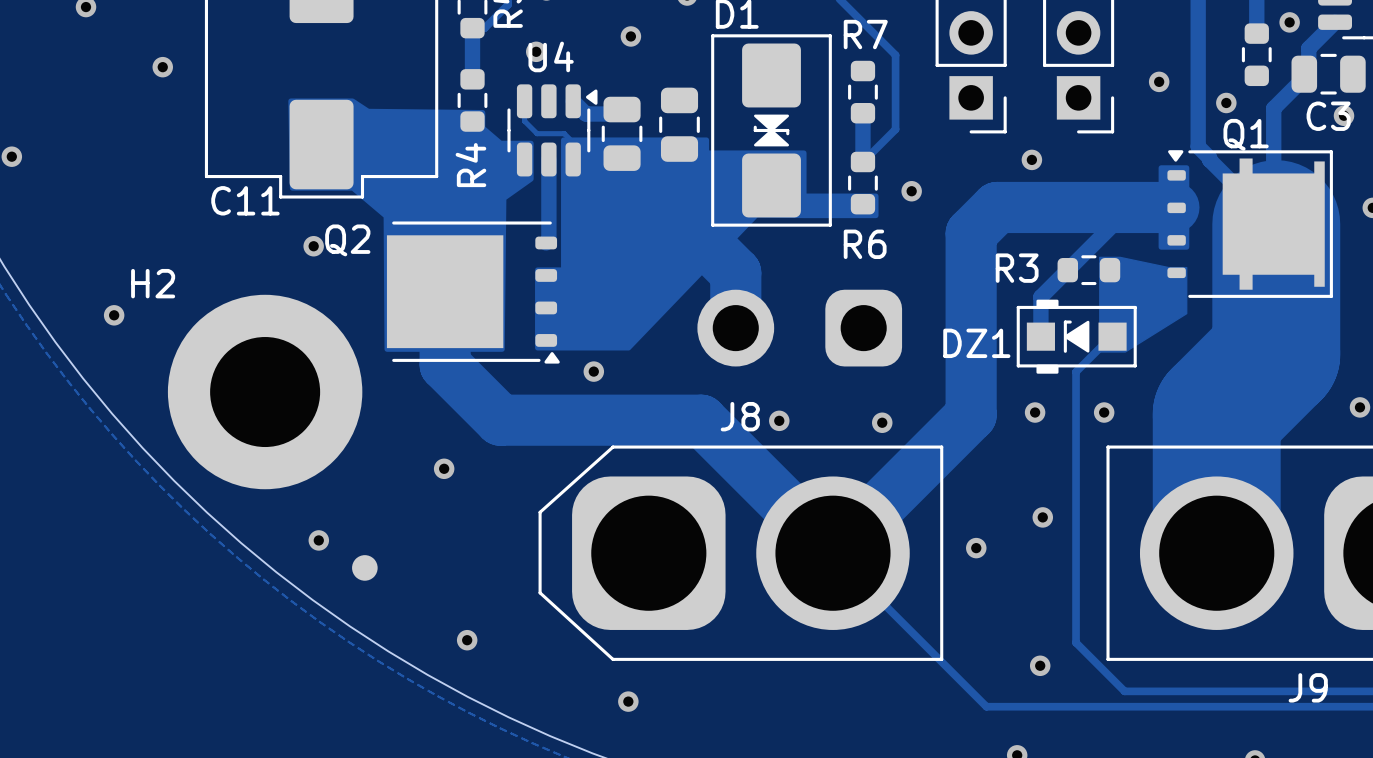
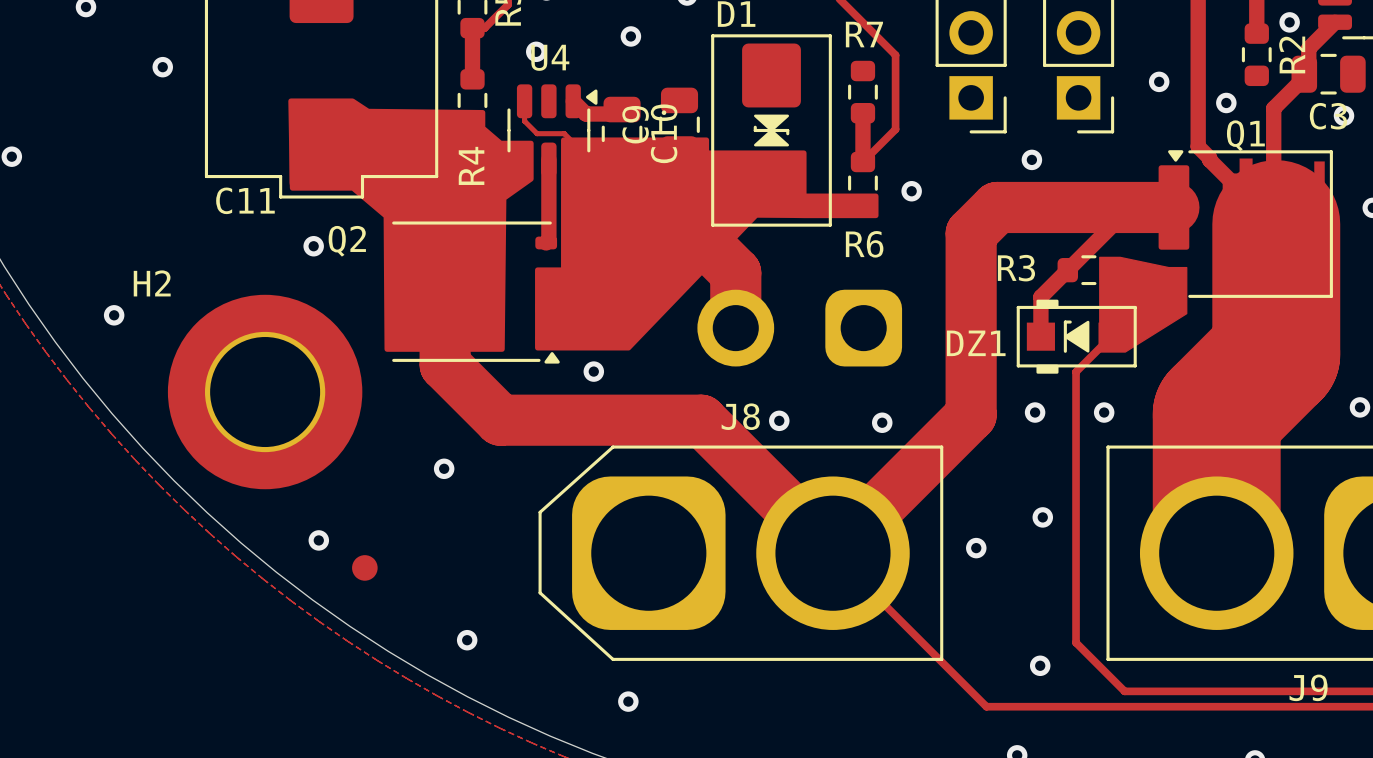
R2 name: none -> R2 (1292, 54)
C9 name: none -> C9 (635, 124)
C10 name: none -> C10 (664, 133)

